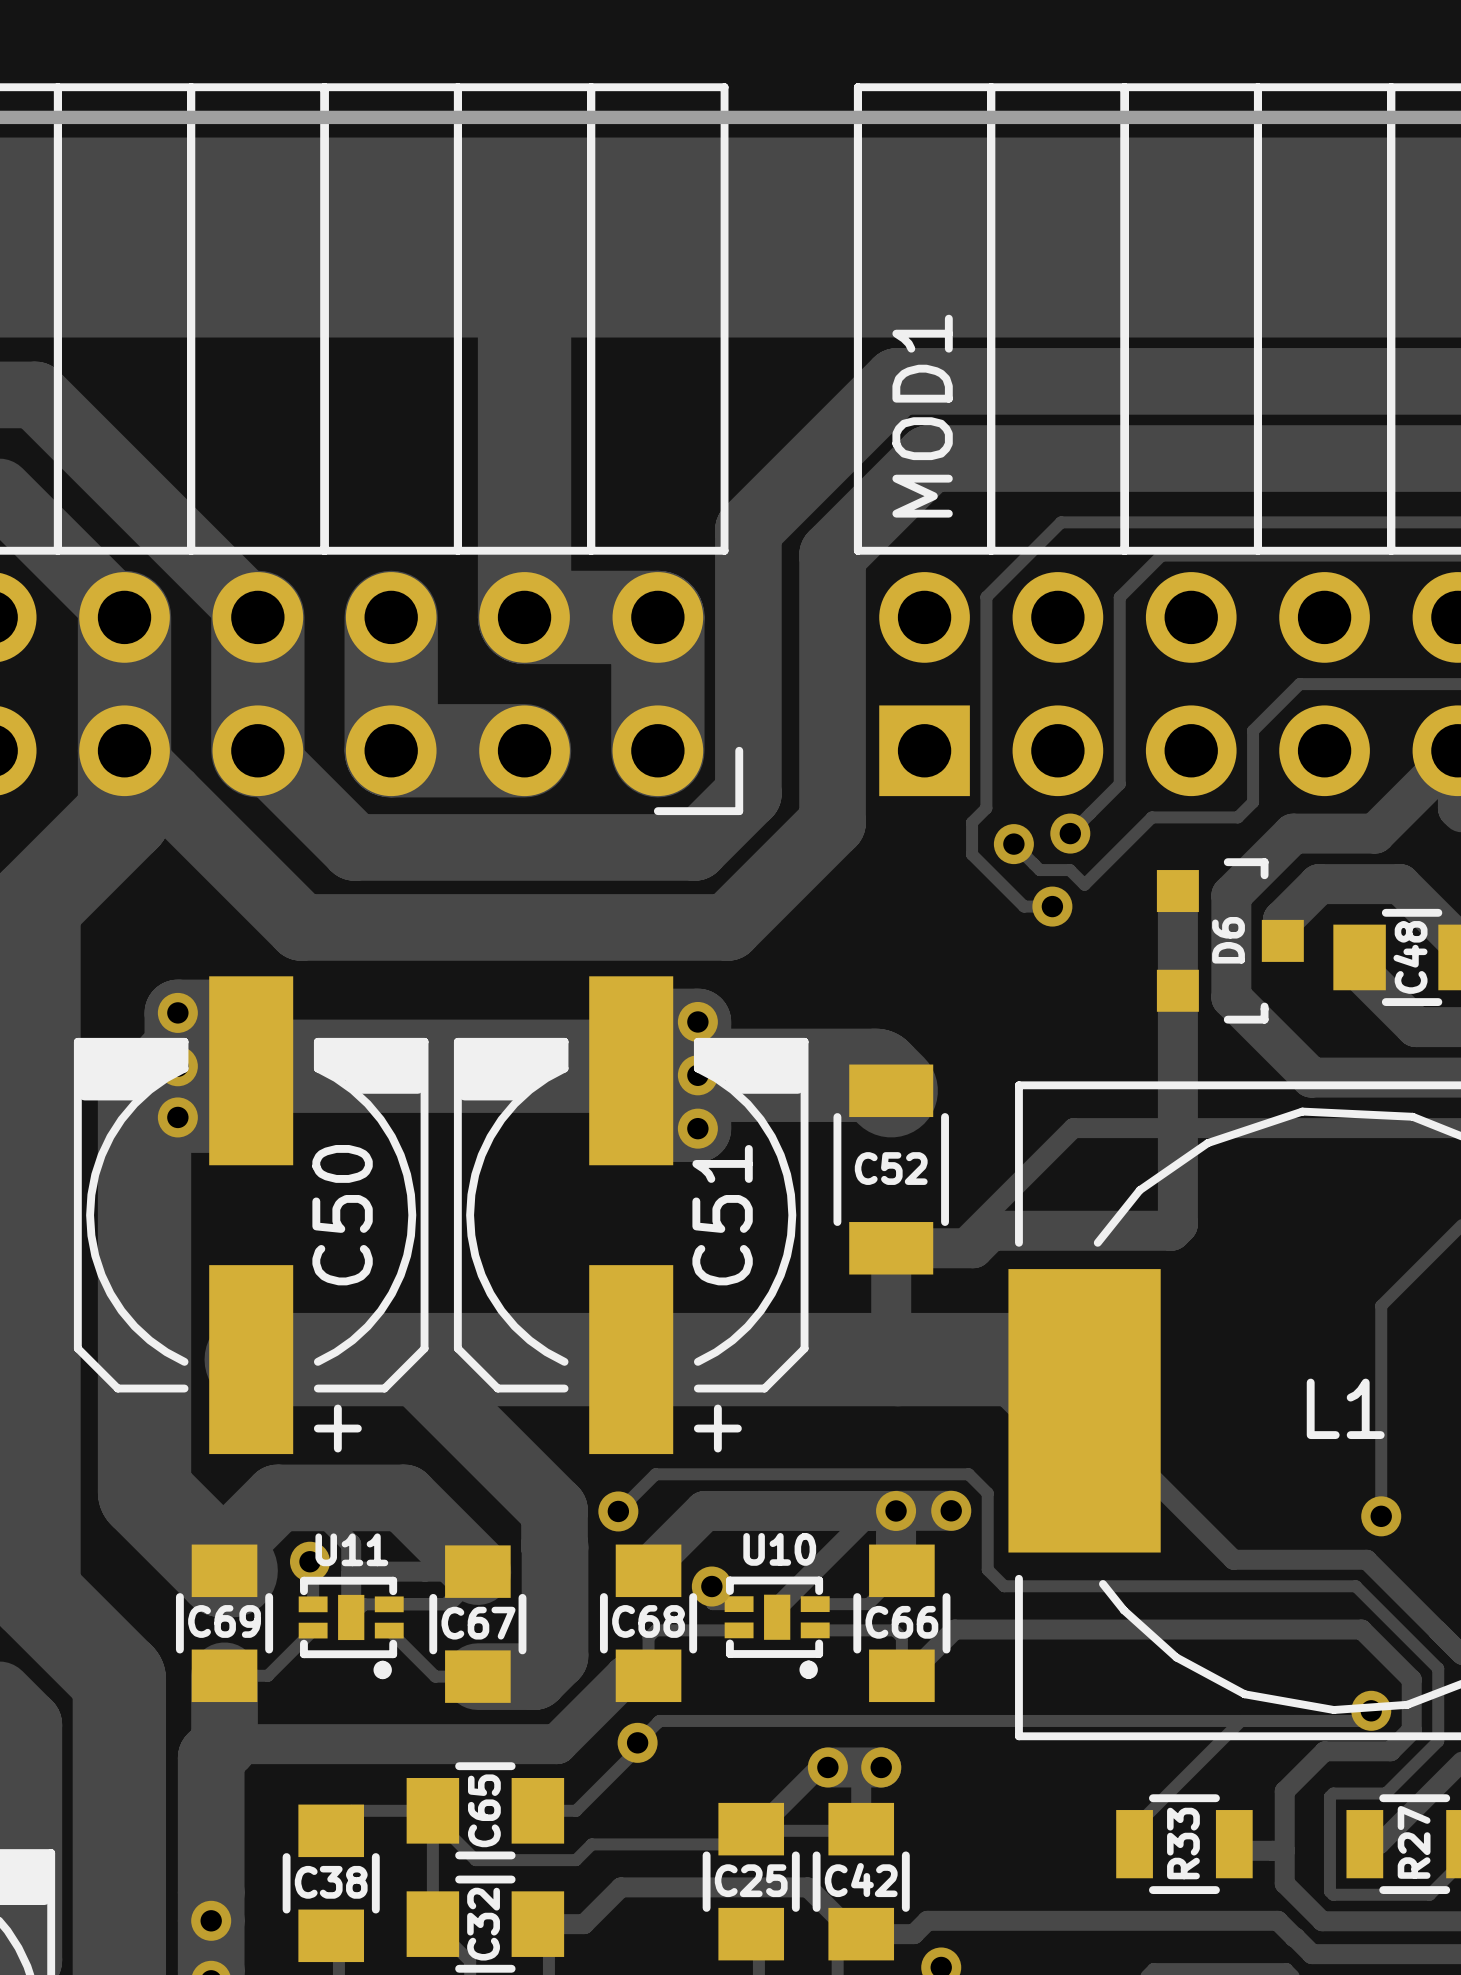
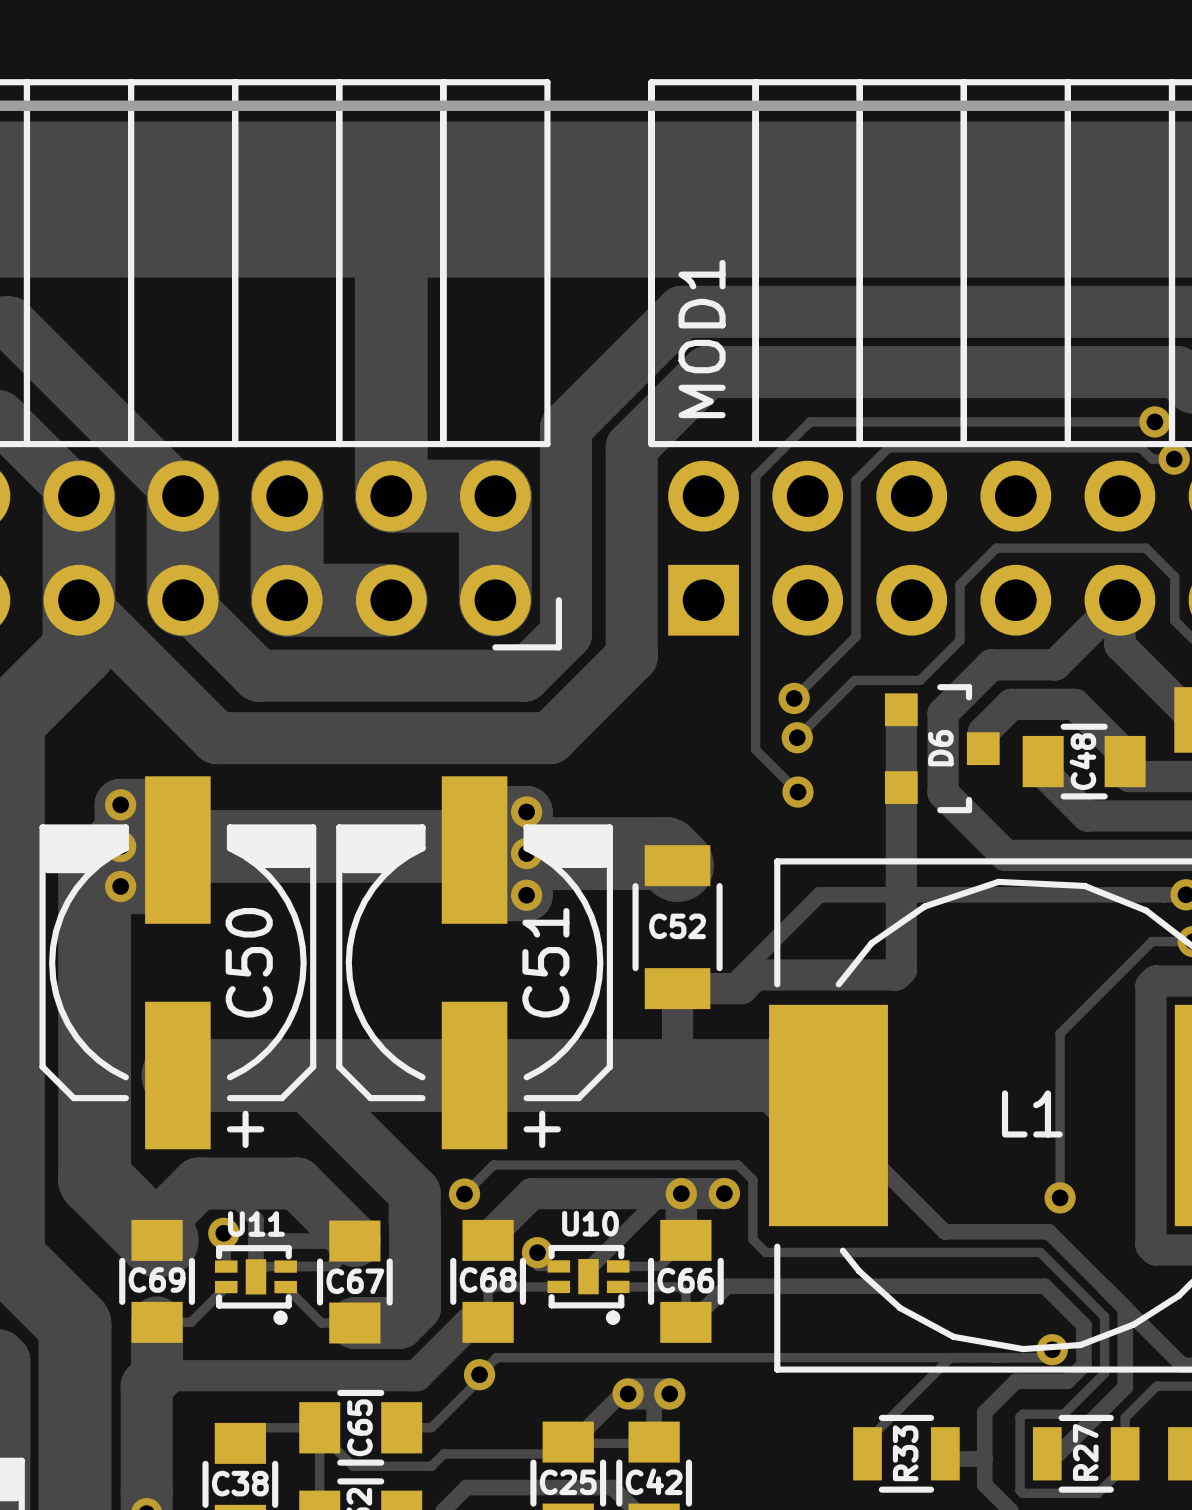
track: (991, 592) (986, 597) (986, 808) (972, 822) (972, 854) (1024, 906) (1052, 906) -> (755, 476) (755, 749) (798, 792)
track: (1119, 784) (1070, 833) -> (855, 626) (855, 636) (794, 698)
track: (1237, 817) (1151, 817) (1084, 884) (1069, 870) (1039, 870) (1013, 844) -> (948, 652) (920, 680) (854, 680) (797, 737)
via: (1070, 833) -> none
via: (1013, 844) -> none
via: none -> (794, 698)
via: (1052, 906) -> none
via: none -> (797, 737)
via: none -> (798, 792)

